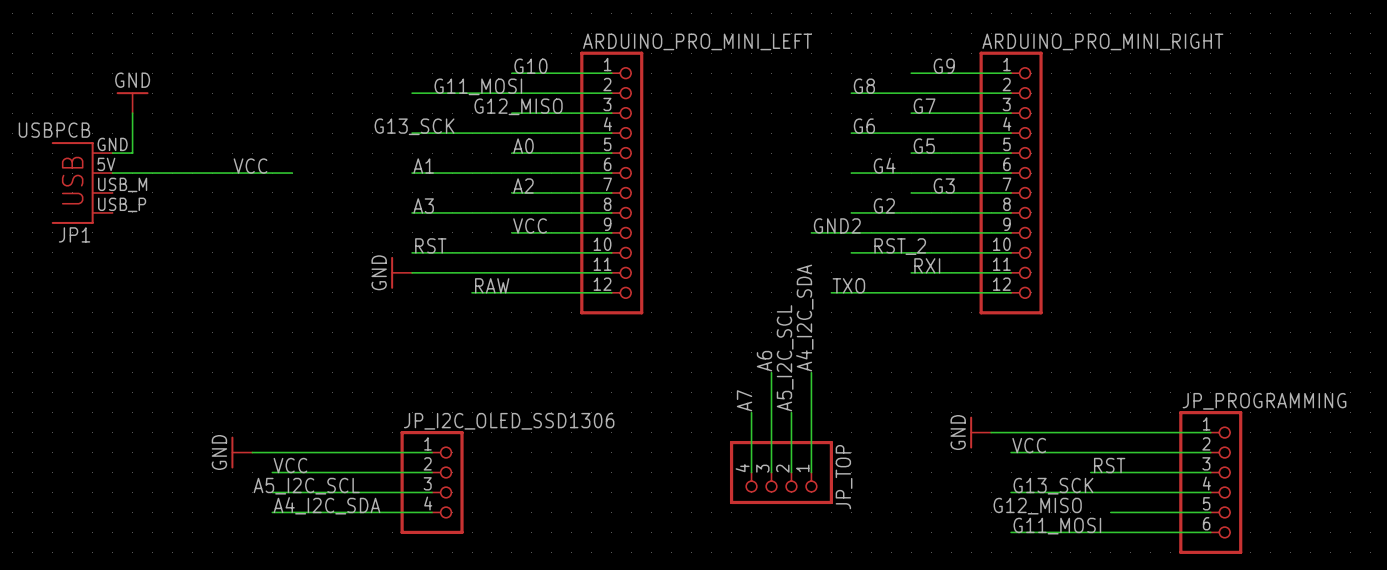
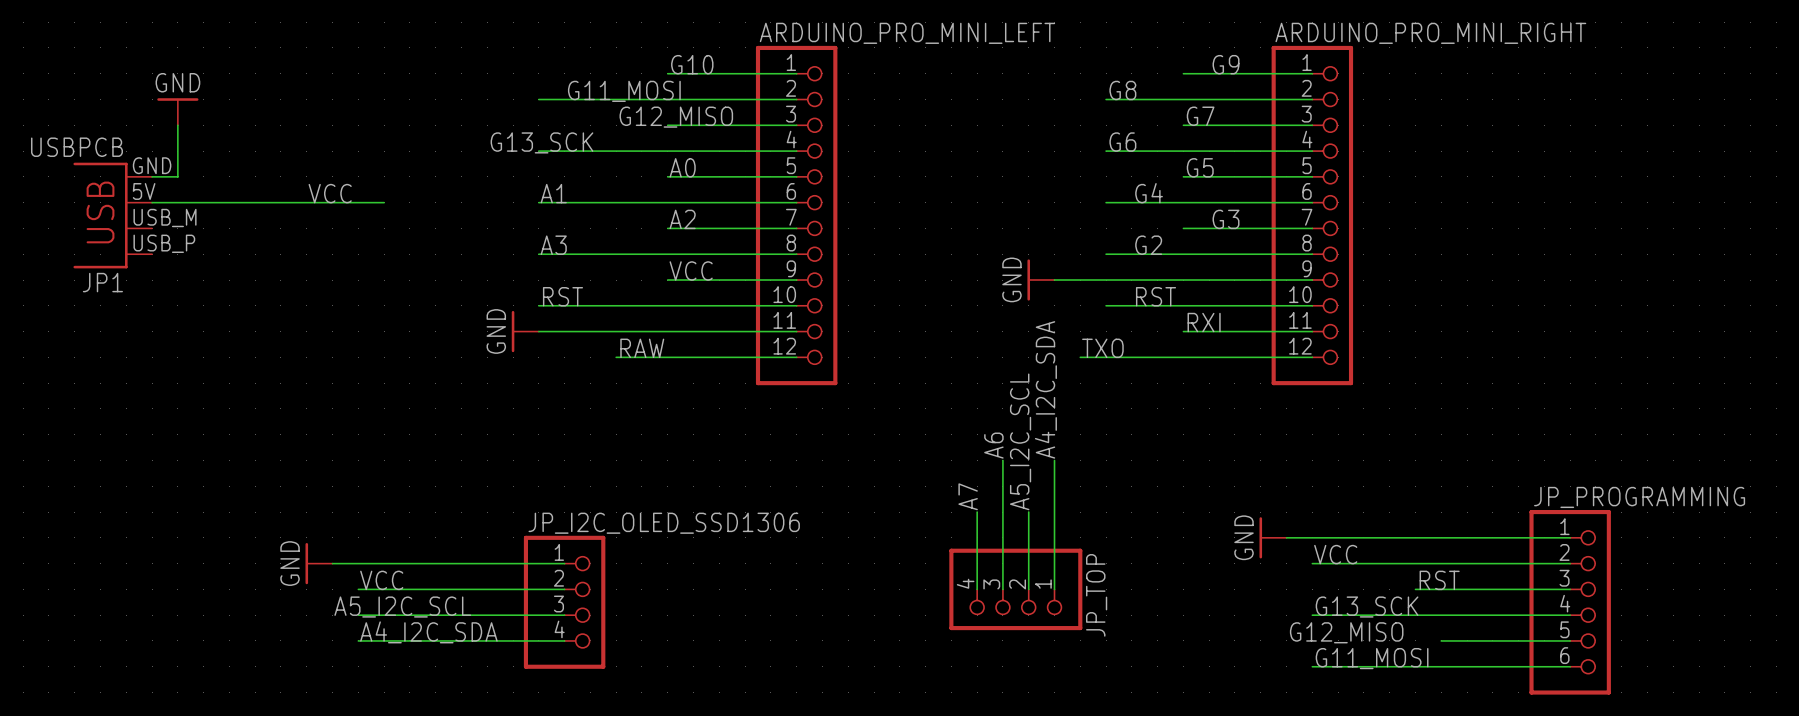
label: GND2 (837, 225) -> none
power symbol: none -> GND (1040, 280)
label: RST_2 (900, 246) -> RST (1156, 296)

